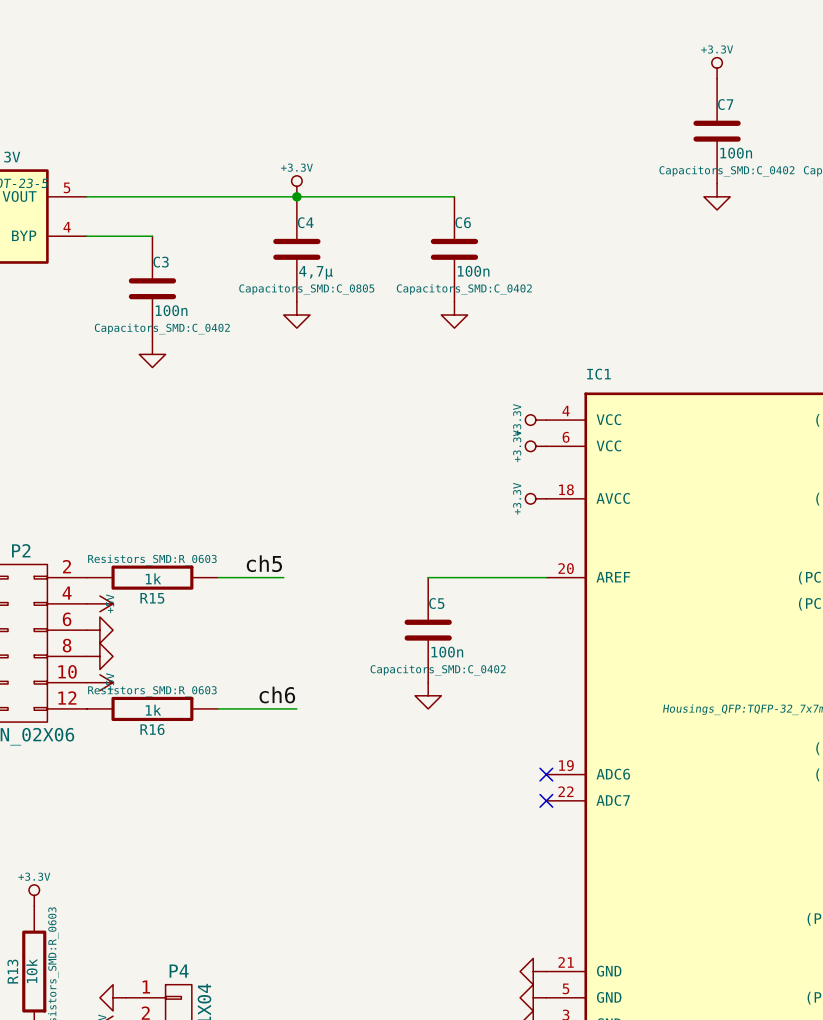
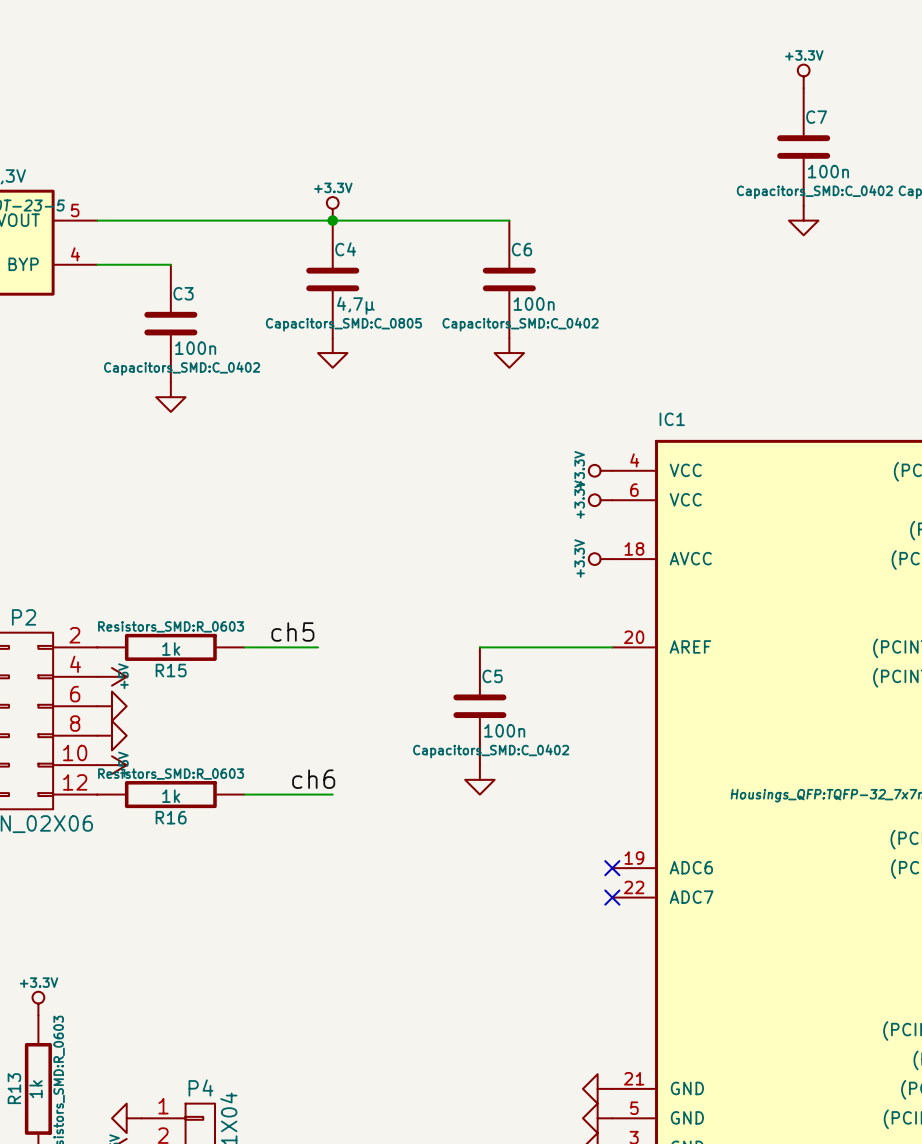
R13 value: 10k (31, 971) -> 1k (35, 1089)

